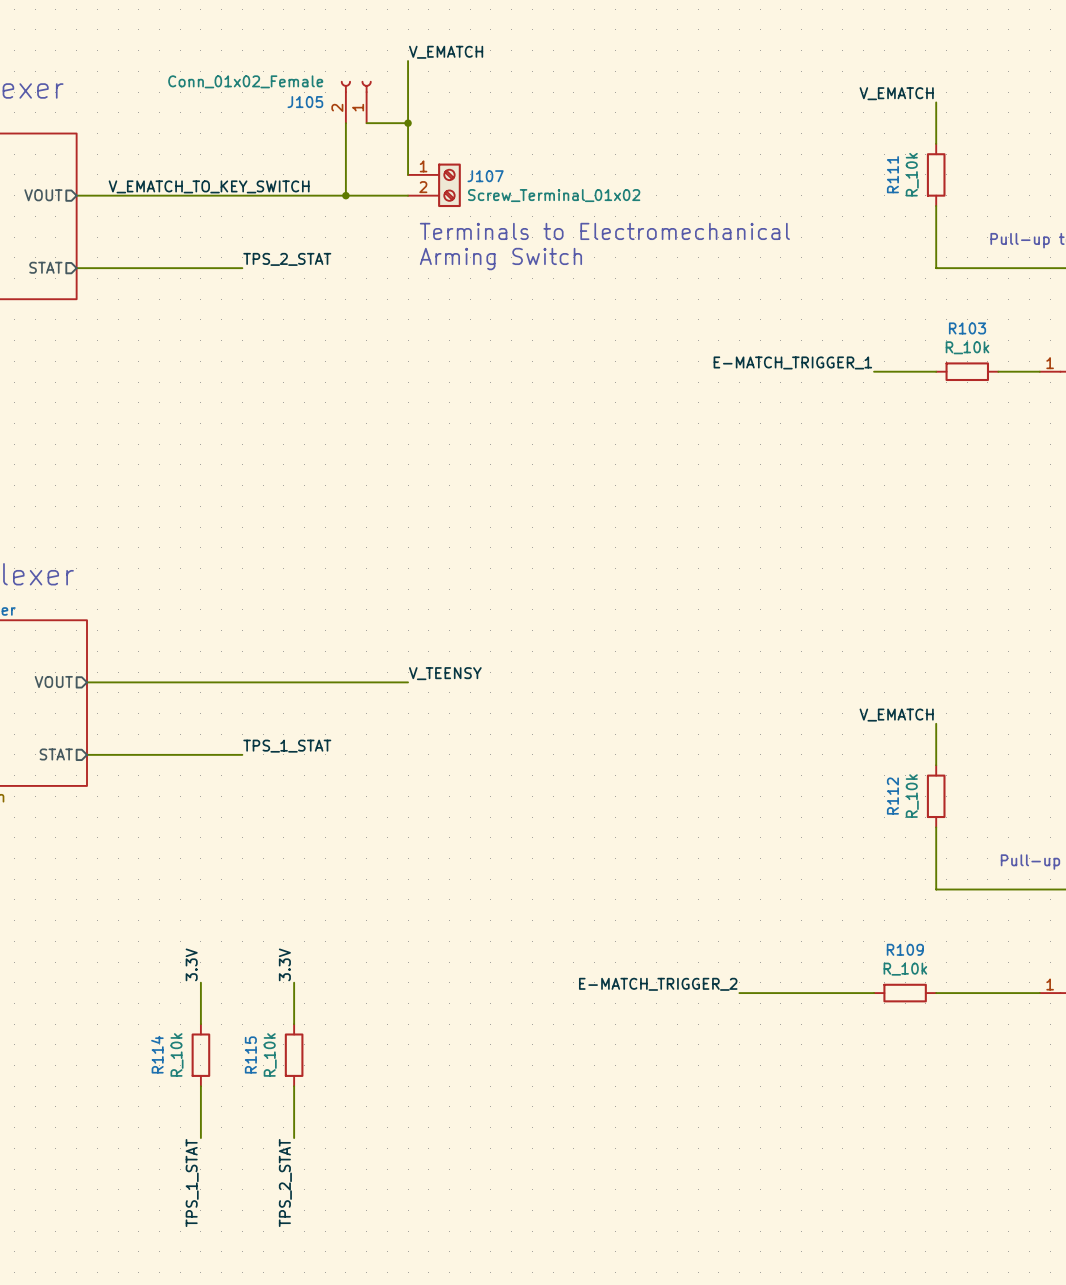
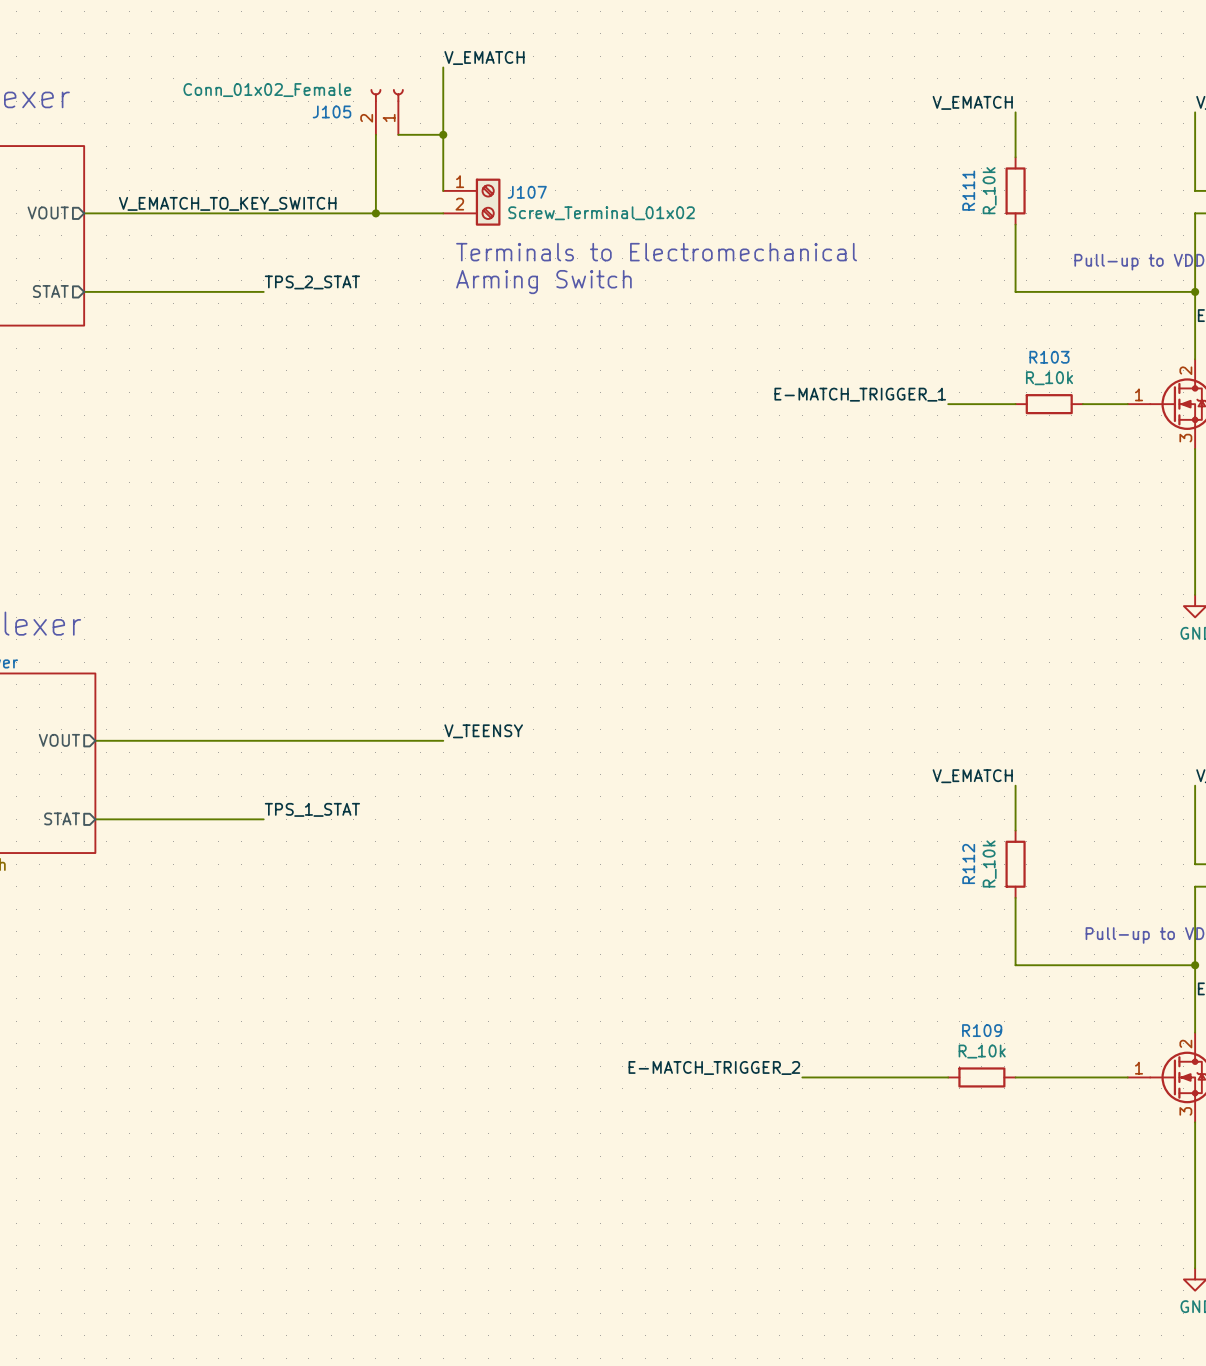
label: 3.3V (191, 964) -> none
label: 3.3V (284, 964) -> none
wire: (200, 982) (200, 1024) -> none
wire: (294, 982) (294, 1024) -> none
R114: R_10k (200, 1055) -> none
R115: R_10k (294, 1055) -> none
wire: (200, 1086) (200, 1138) -> none
wire: (294, 1086) (294, 1138) -> none
label: TPS_1_STAT (192, 1183) -> none
label: TPS_2_STAT (285, 1183) -> none

